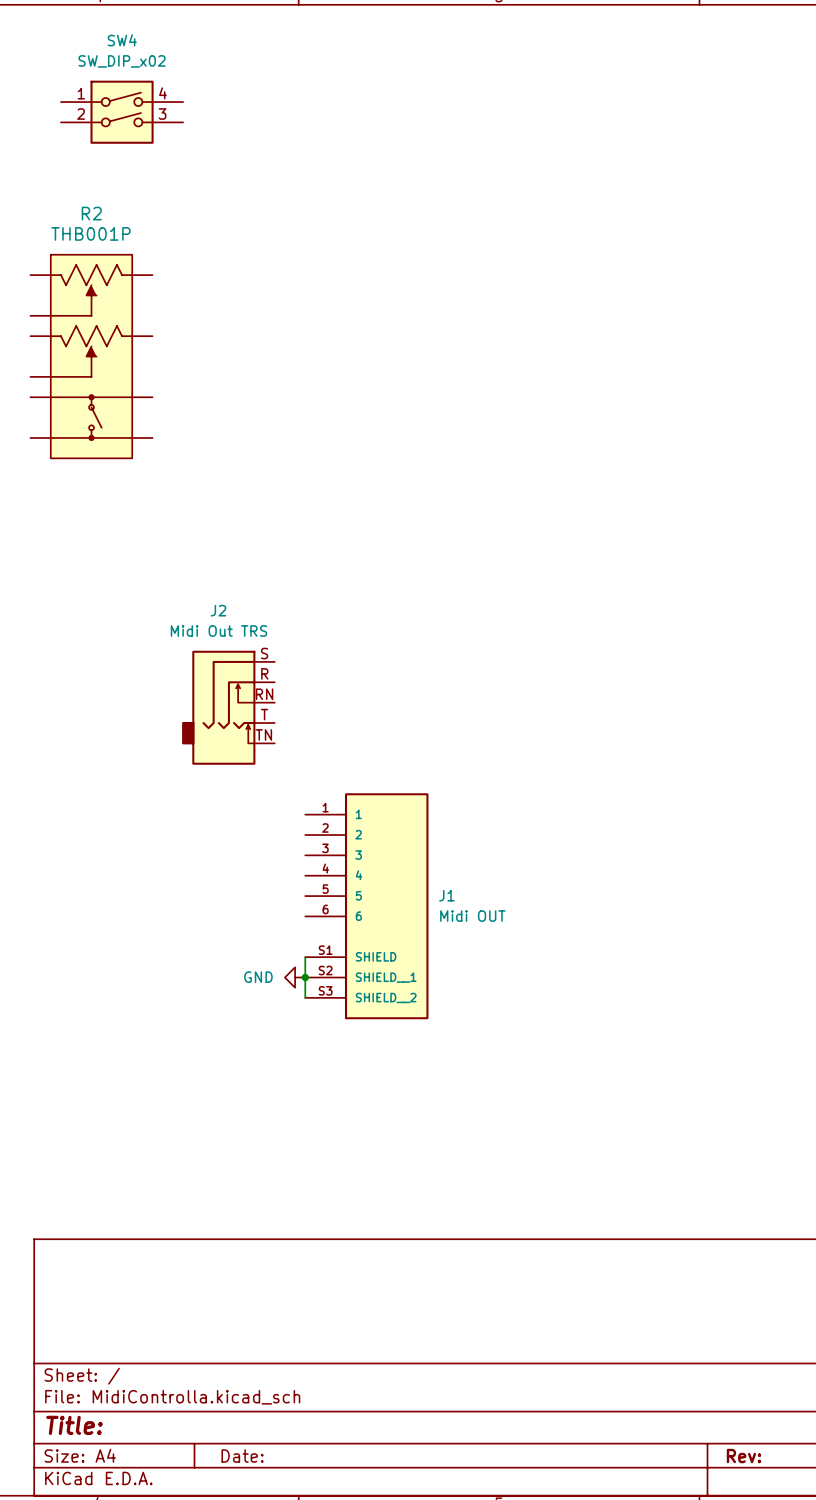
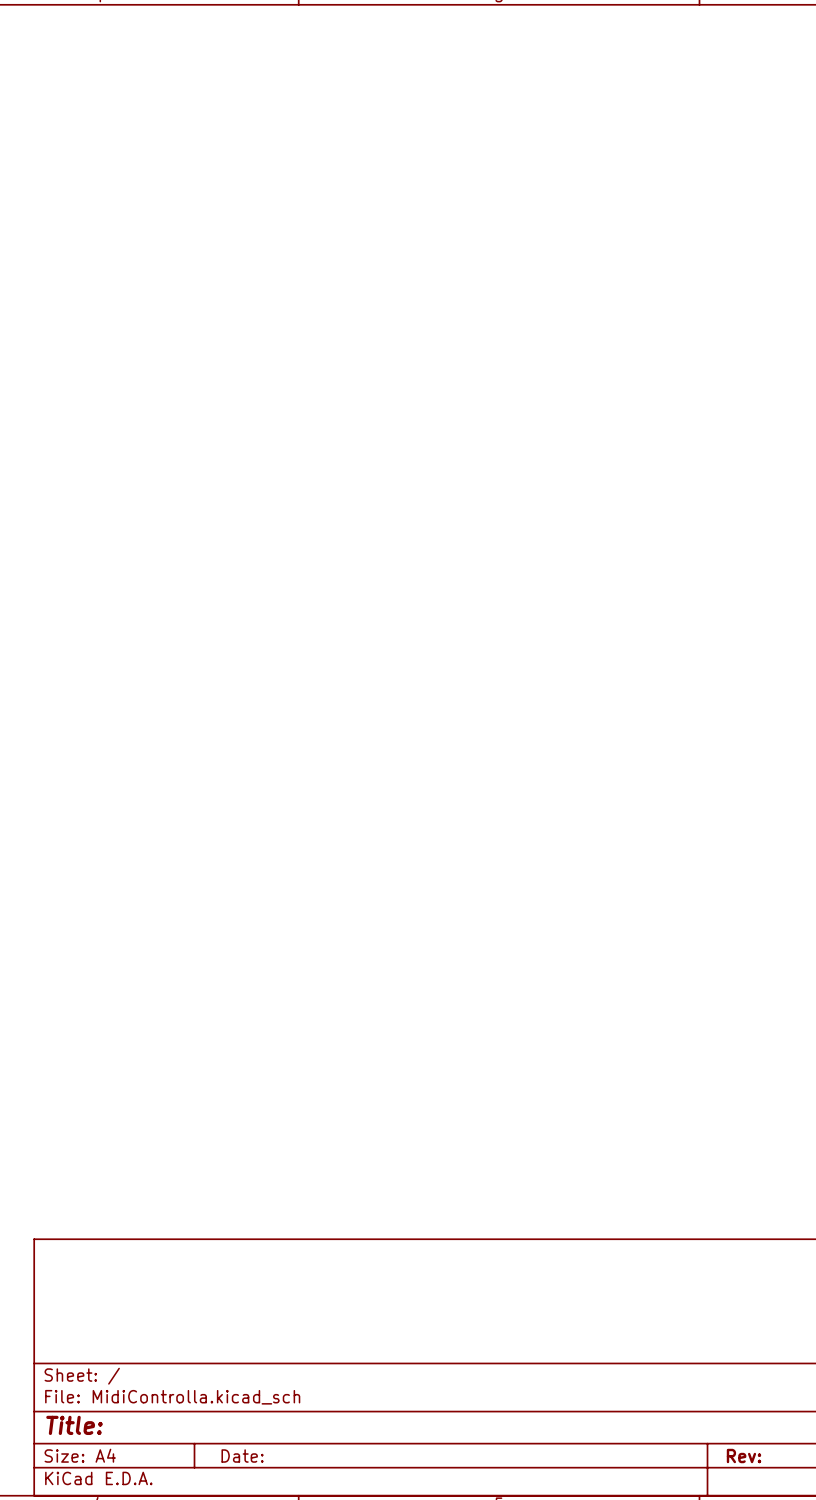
SW4: SW_DIP_x02 (122, 112) -> none
R2: THB001P (91, 356) -> none
J2: Midi Out TRS (228, 707) -> none
J1: Midi OUT (366, 906) -> none
wire: (305, 957) (305, 997) -> none
power symbol: GND (295, 977) -> none
junction: (305, 977) -> none

